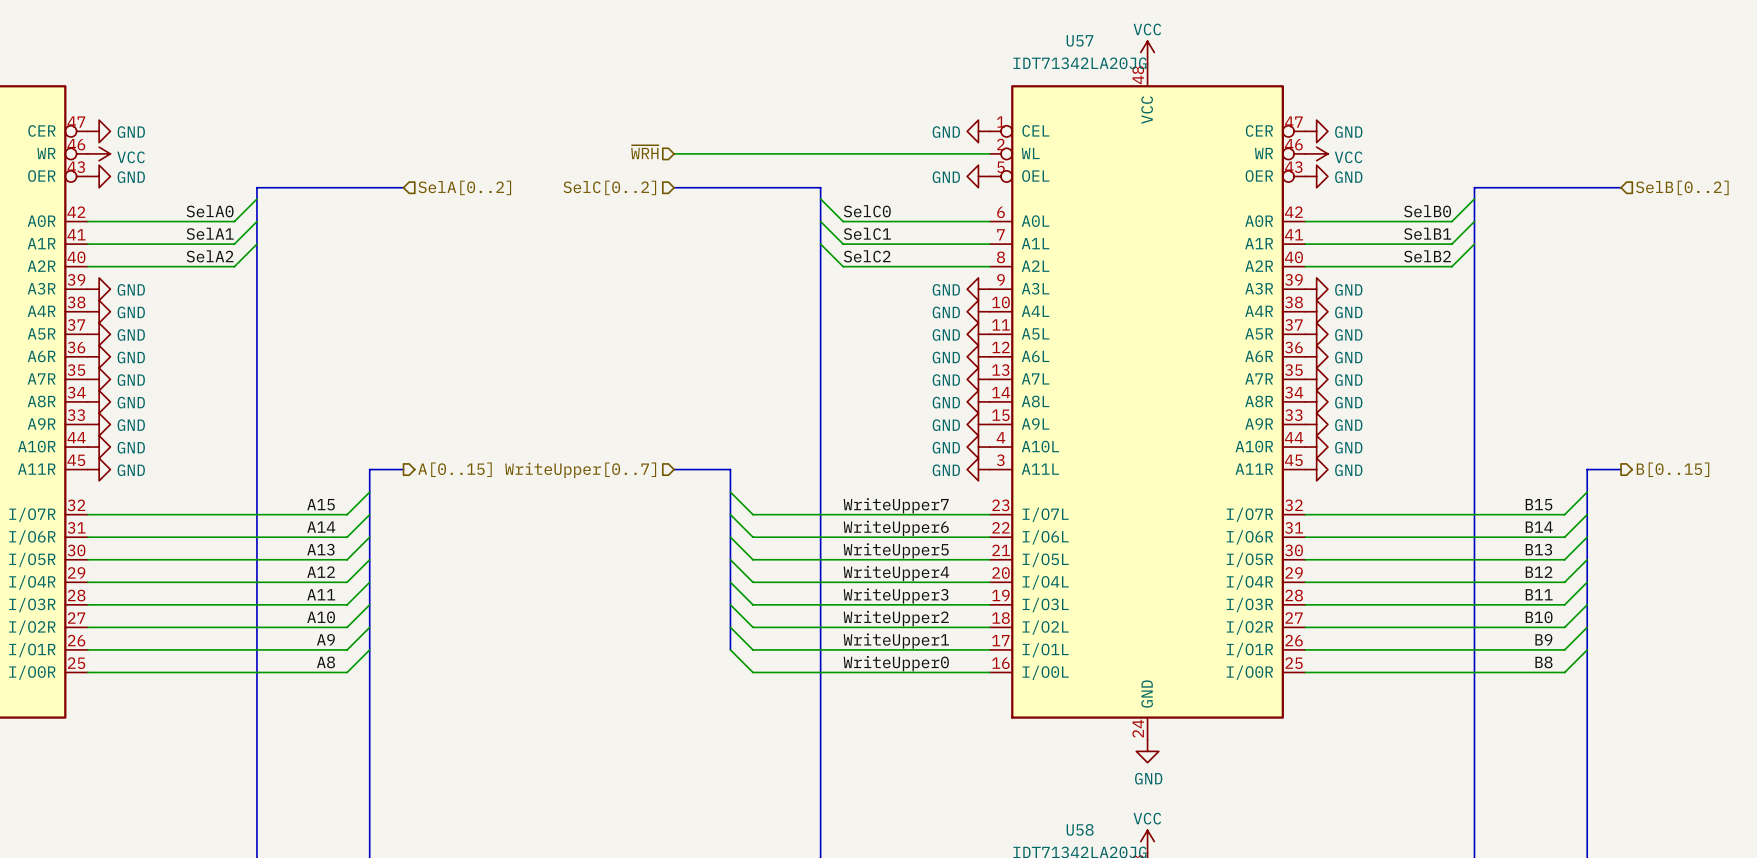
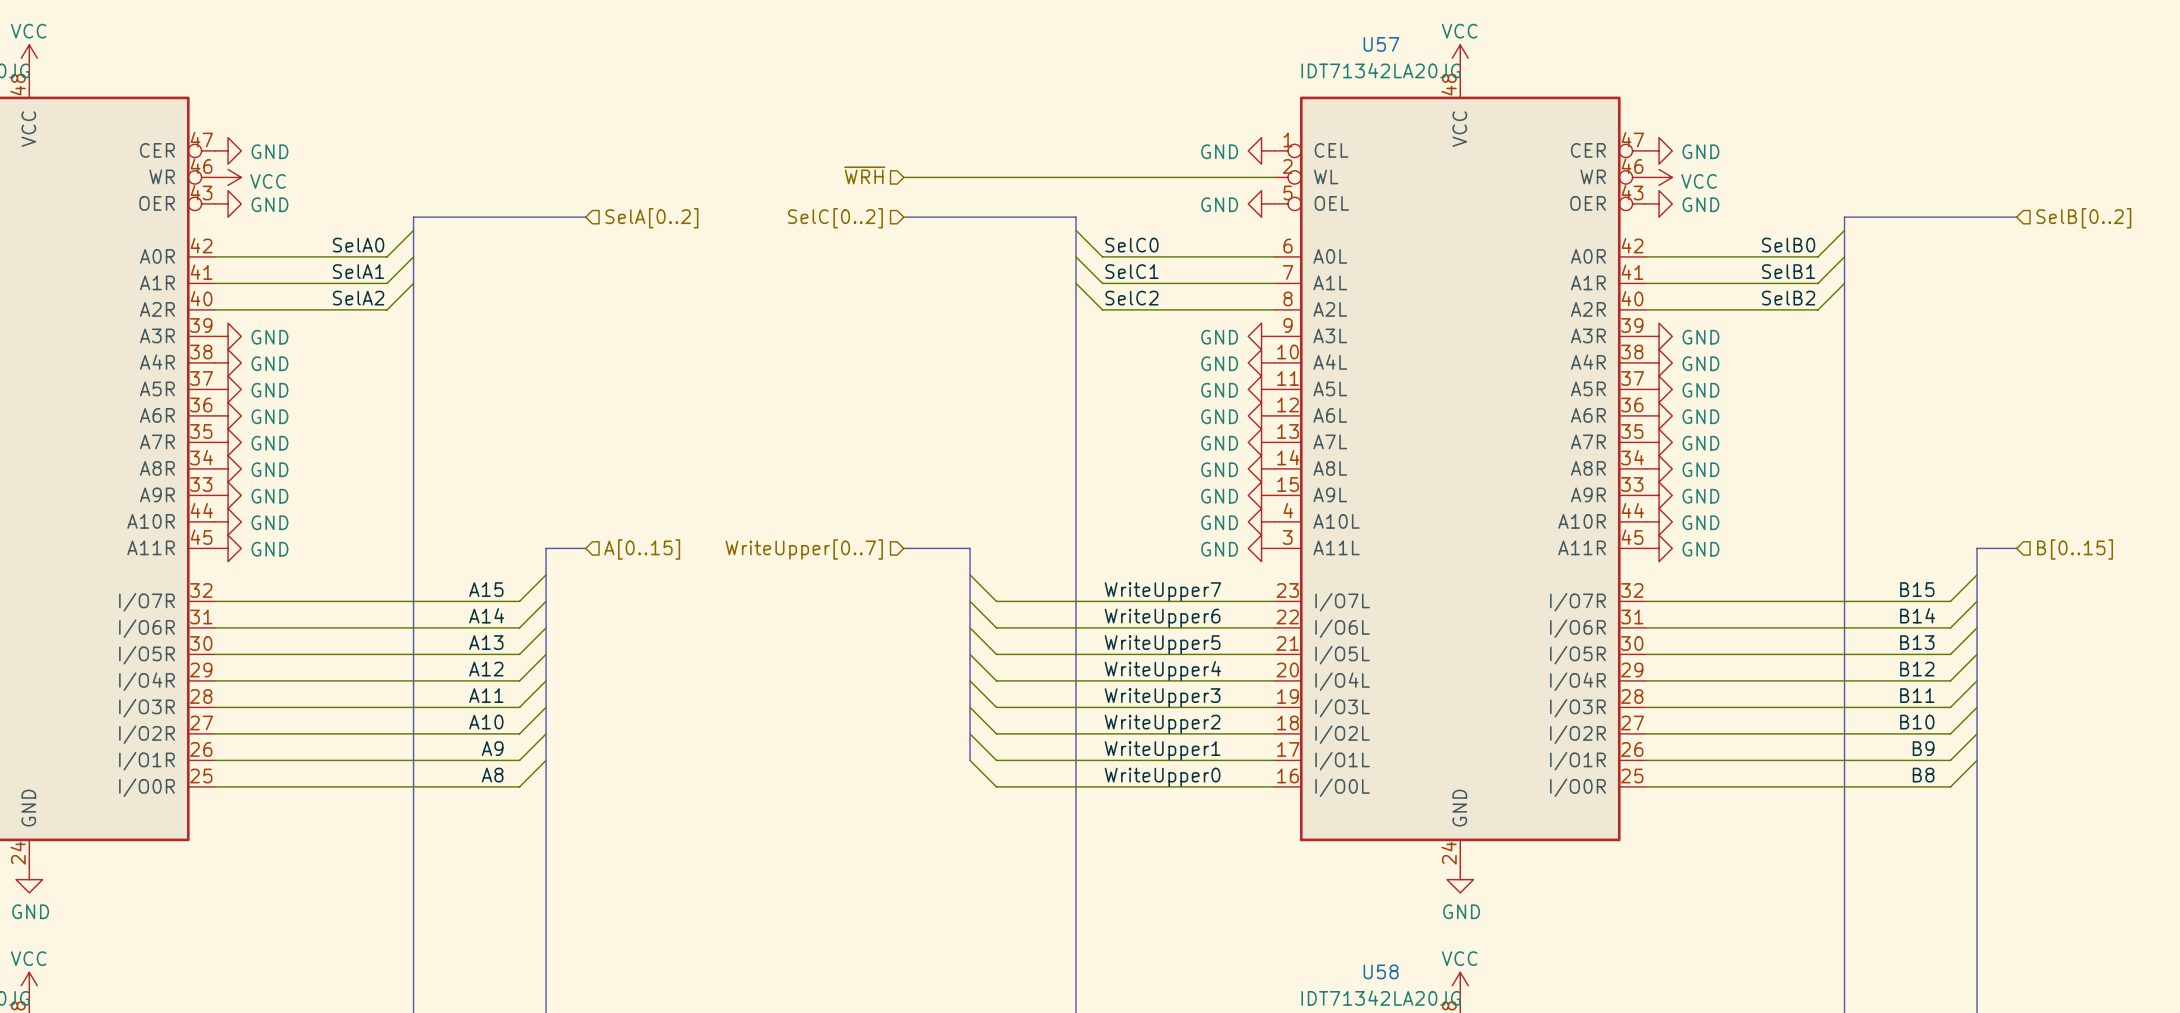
hierarchical label shape: output (455, 469) -> input (642, 549)
hierarchical label shape: output (1673, 469) -> input (2075, 549)

